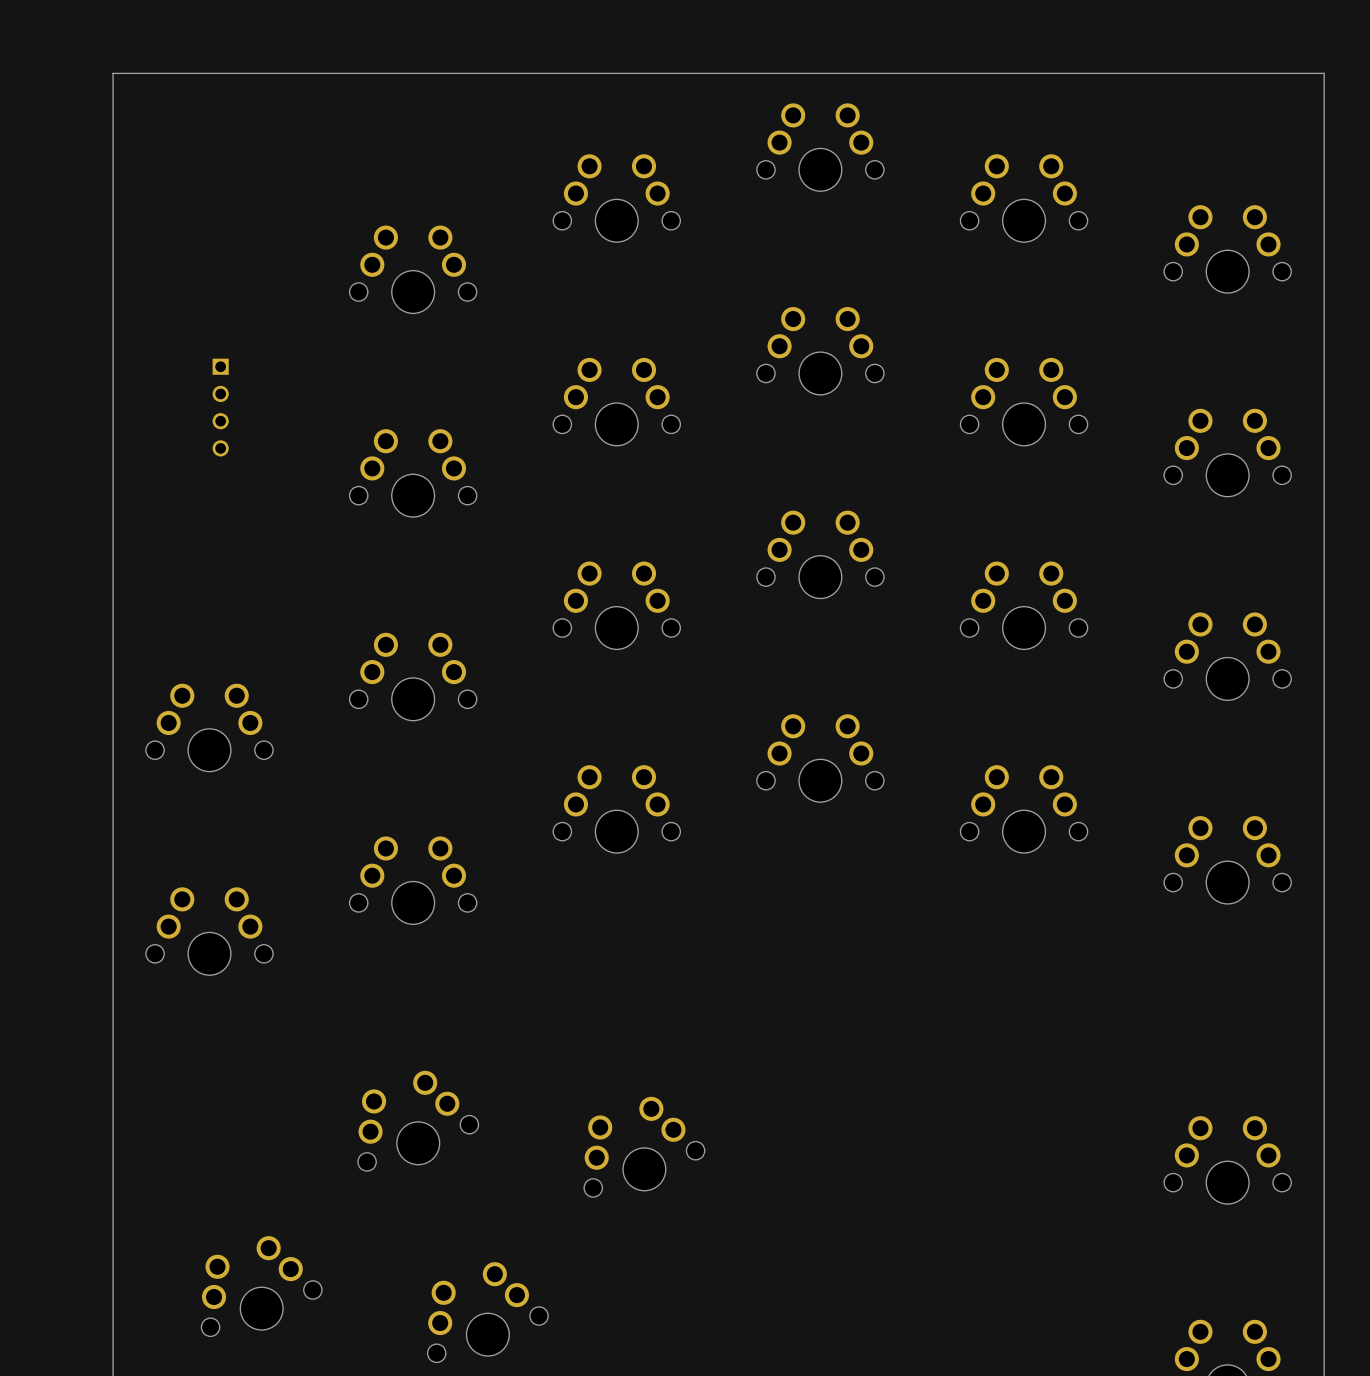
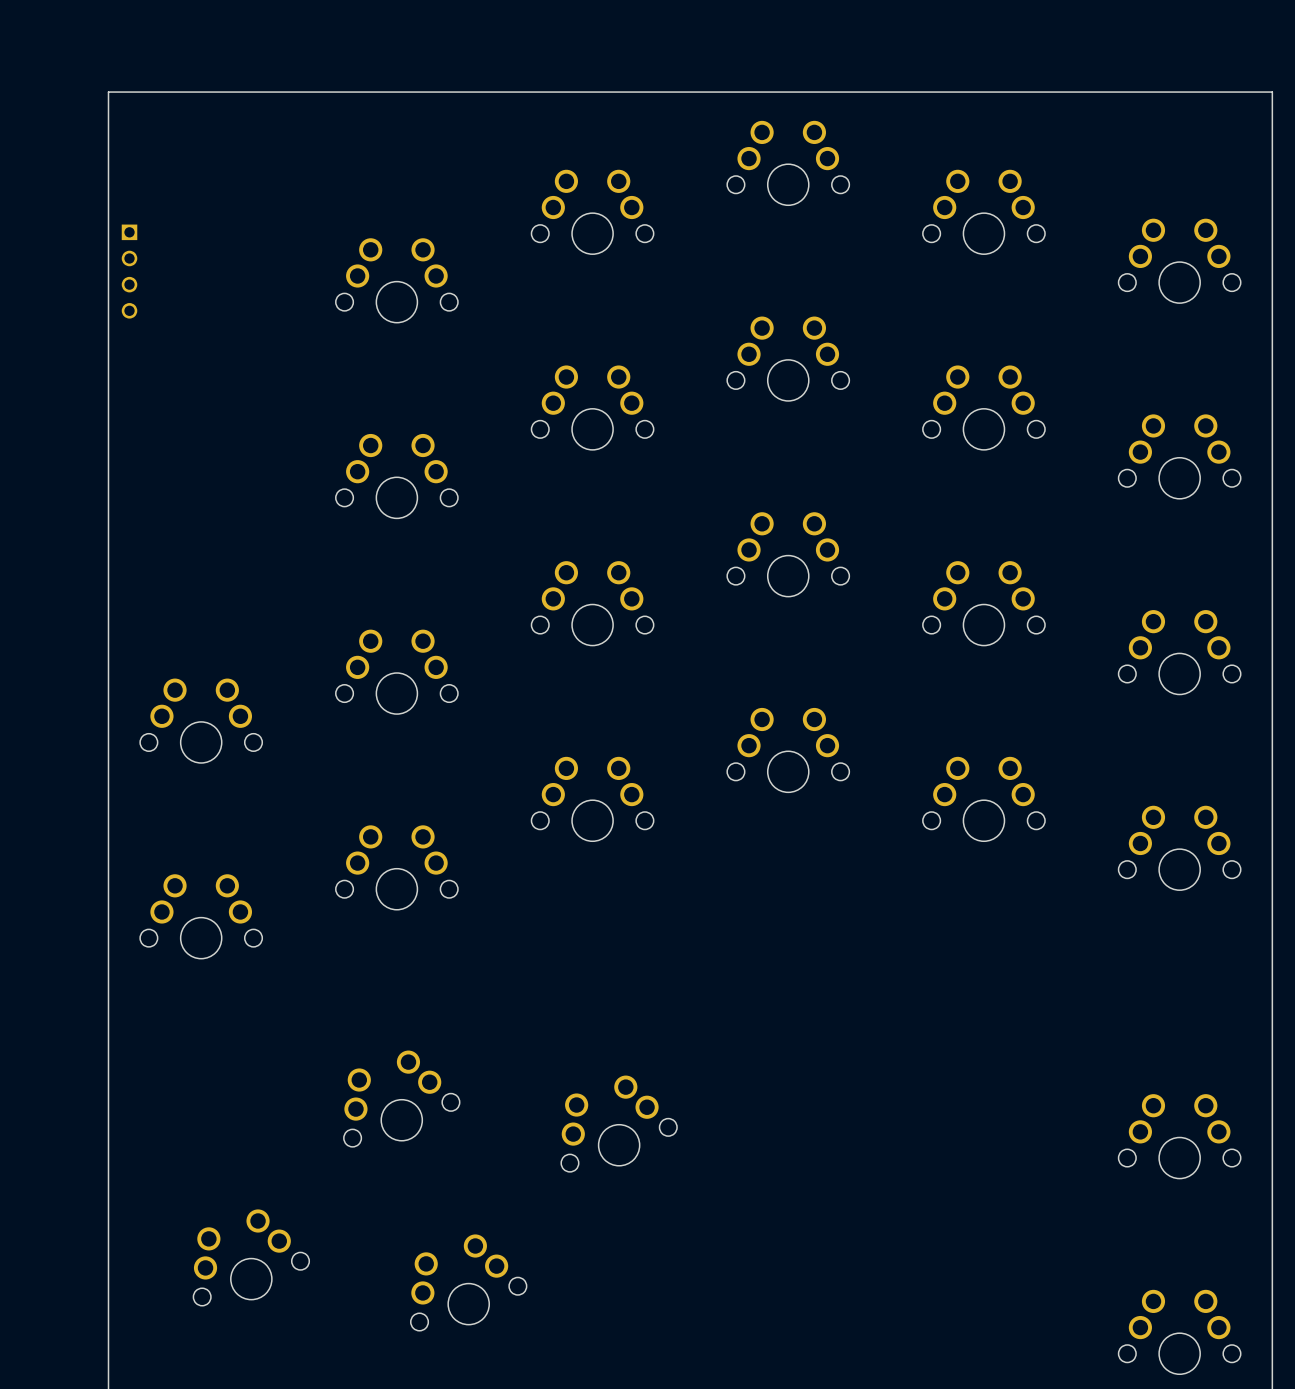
part position: (220, 407) -> (129, 271)

